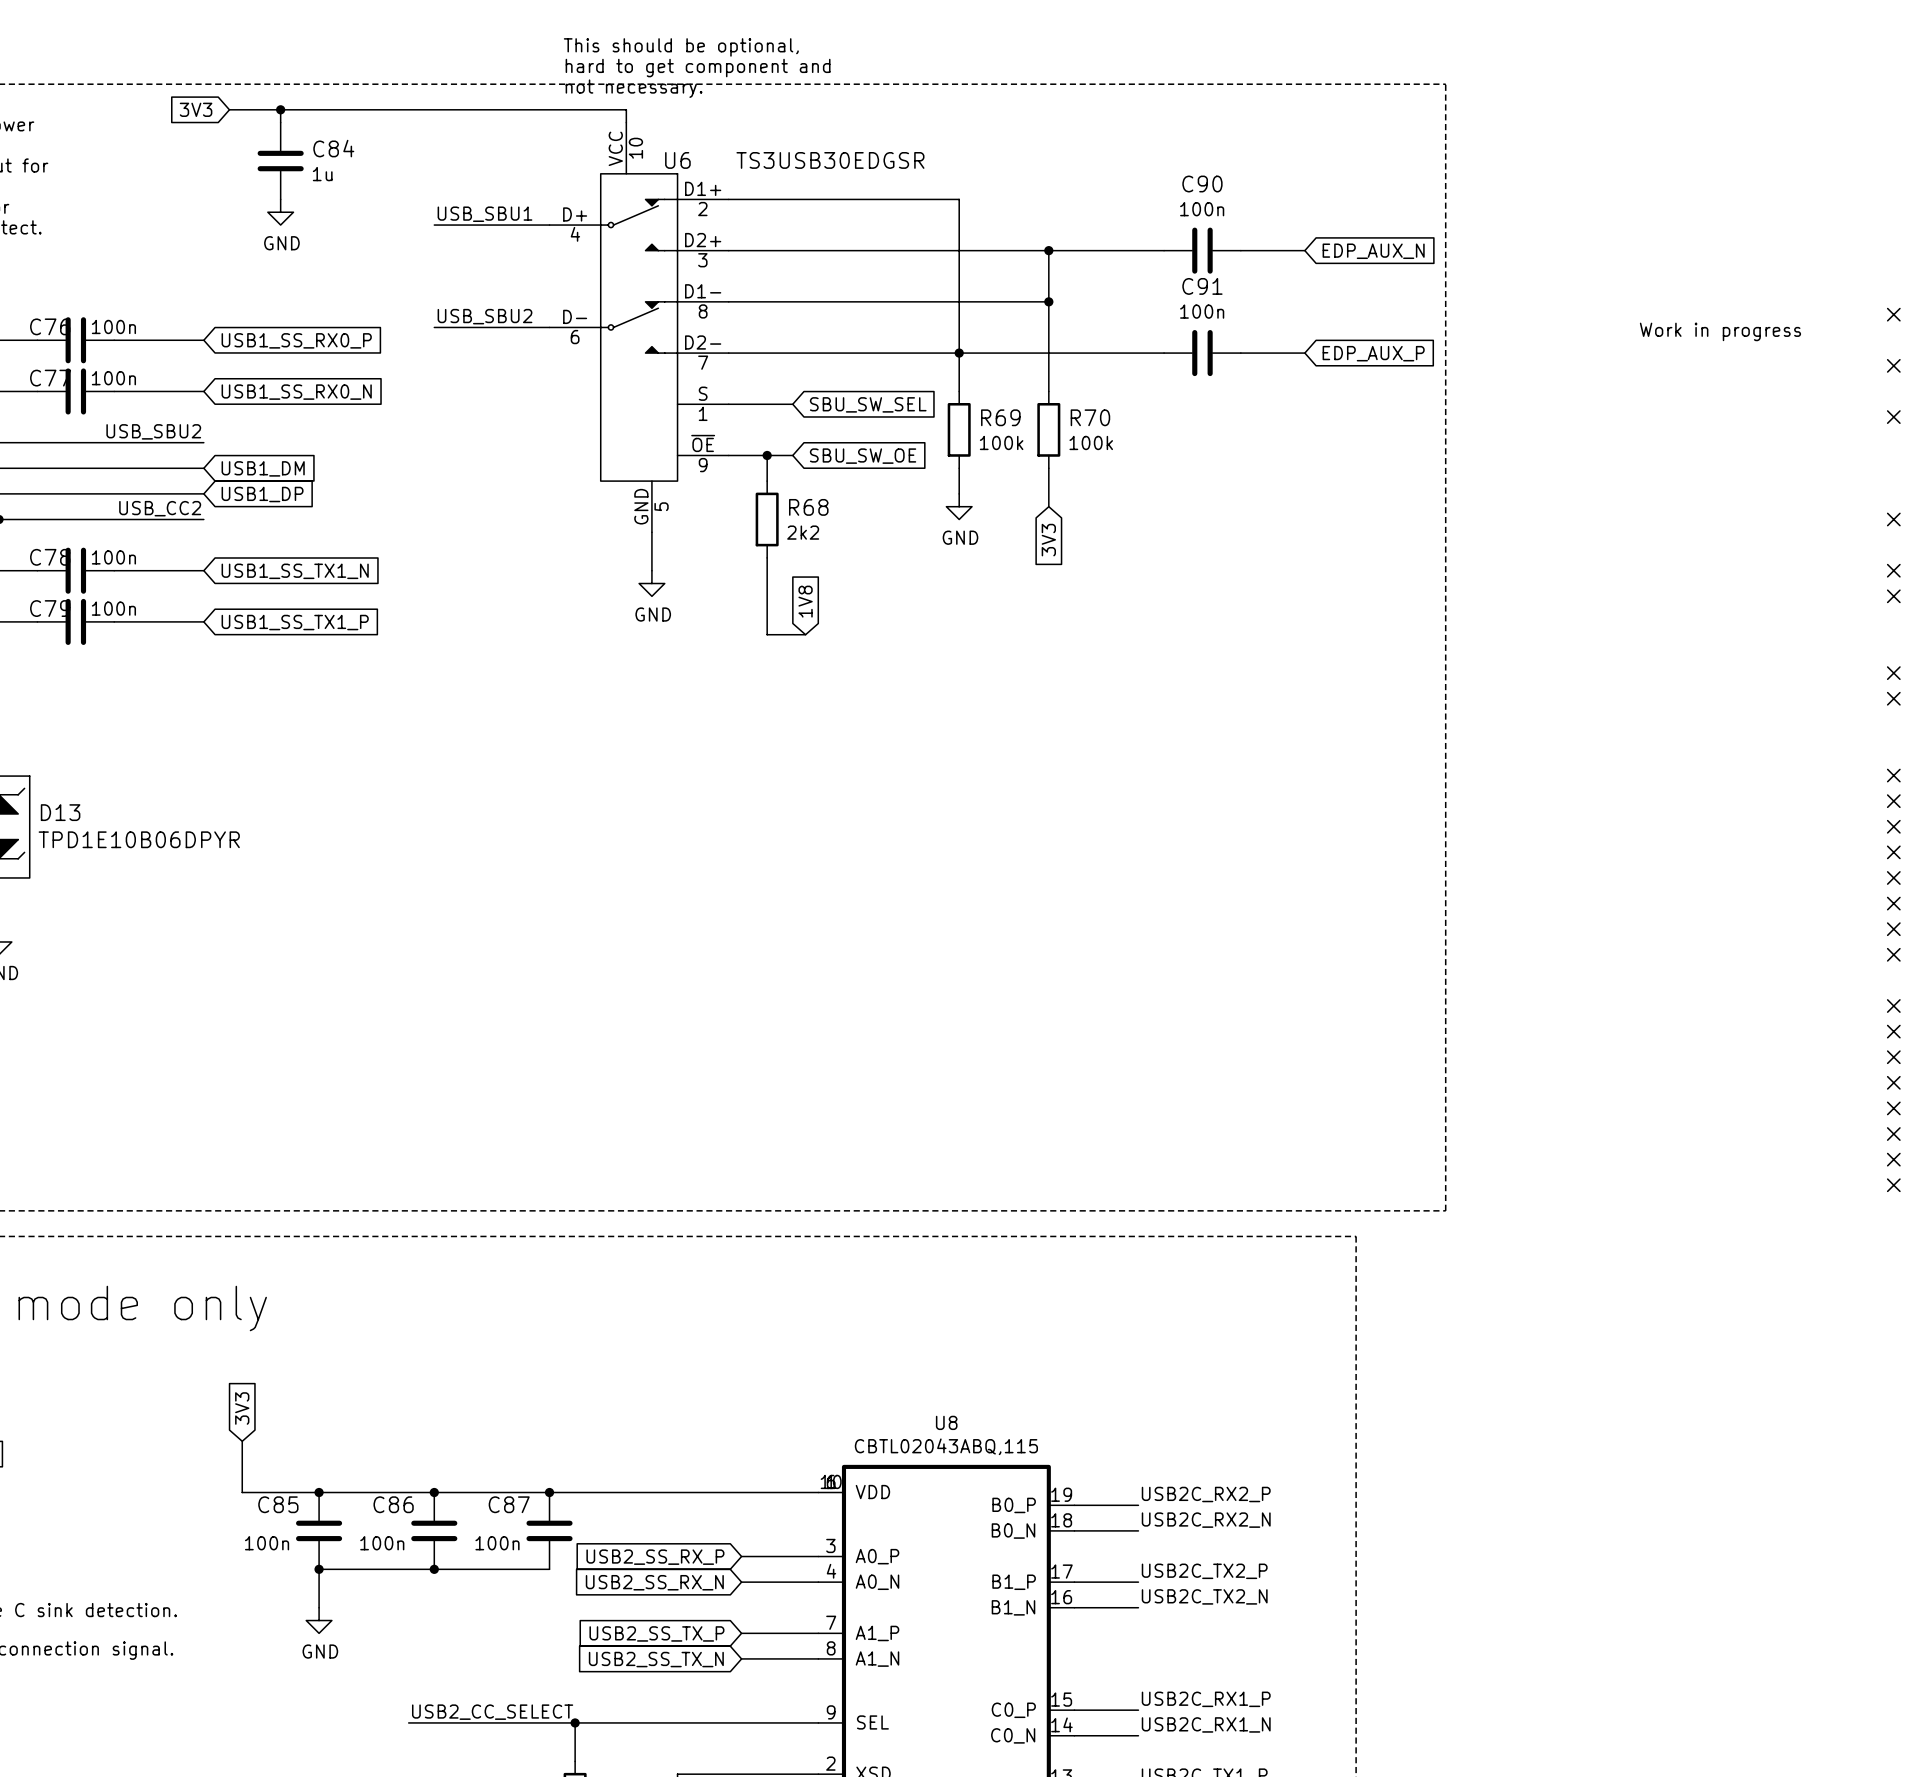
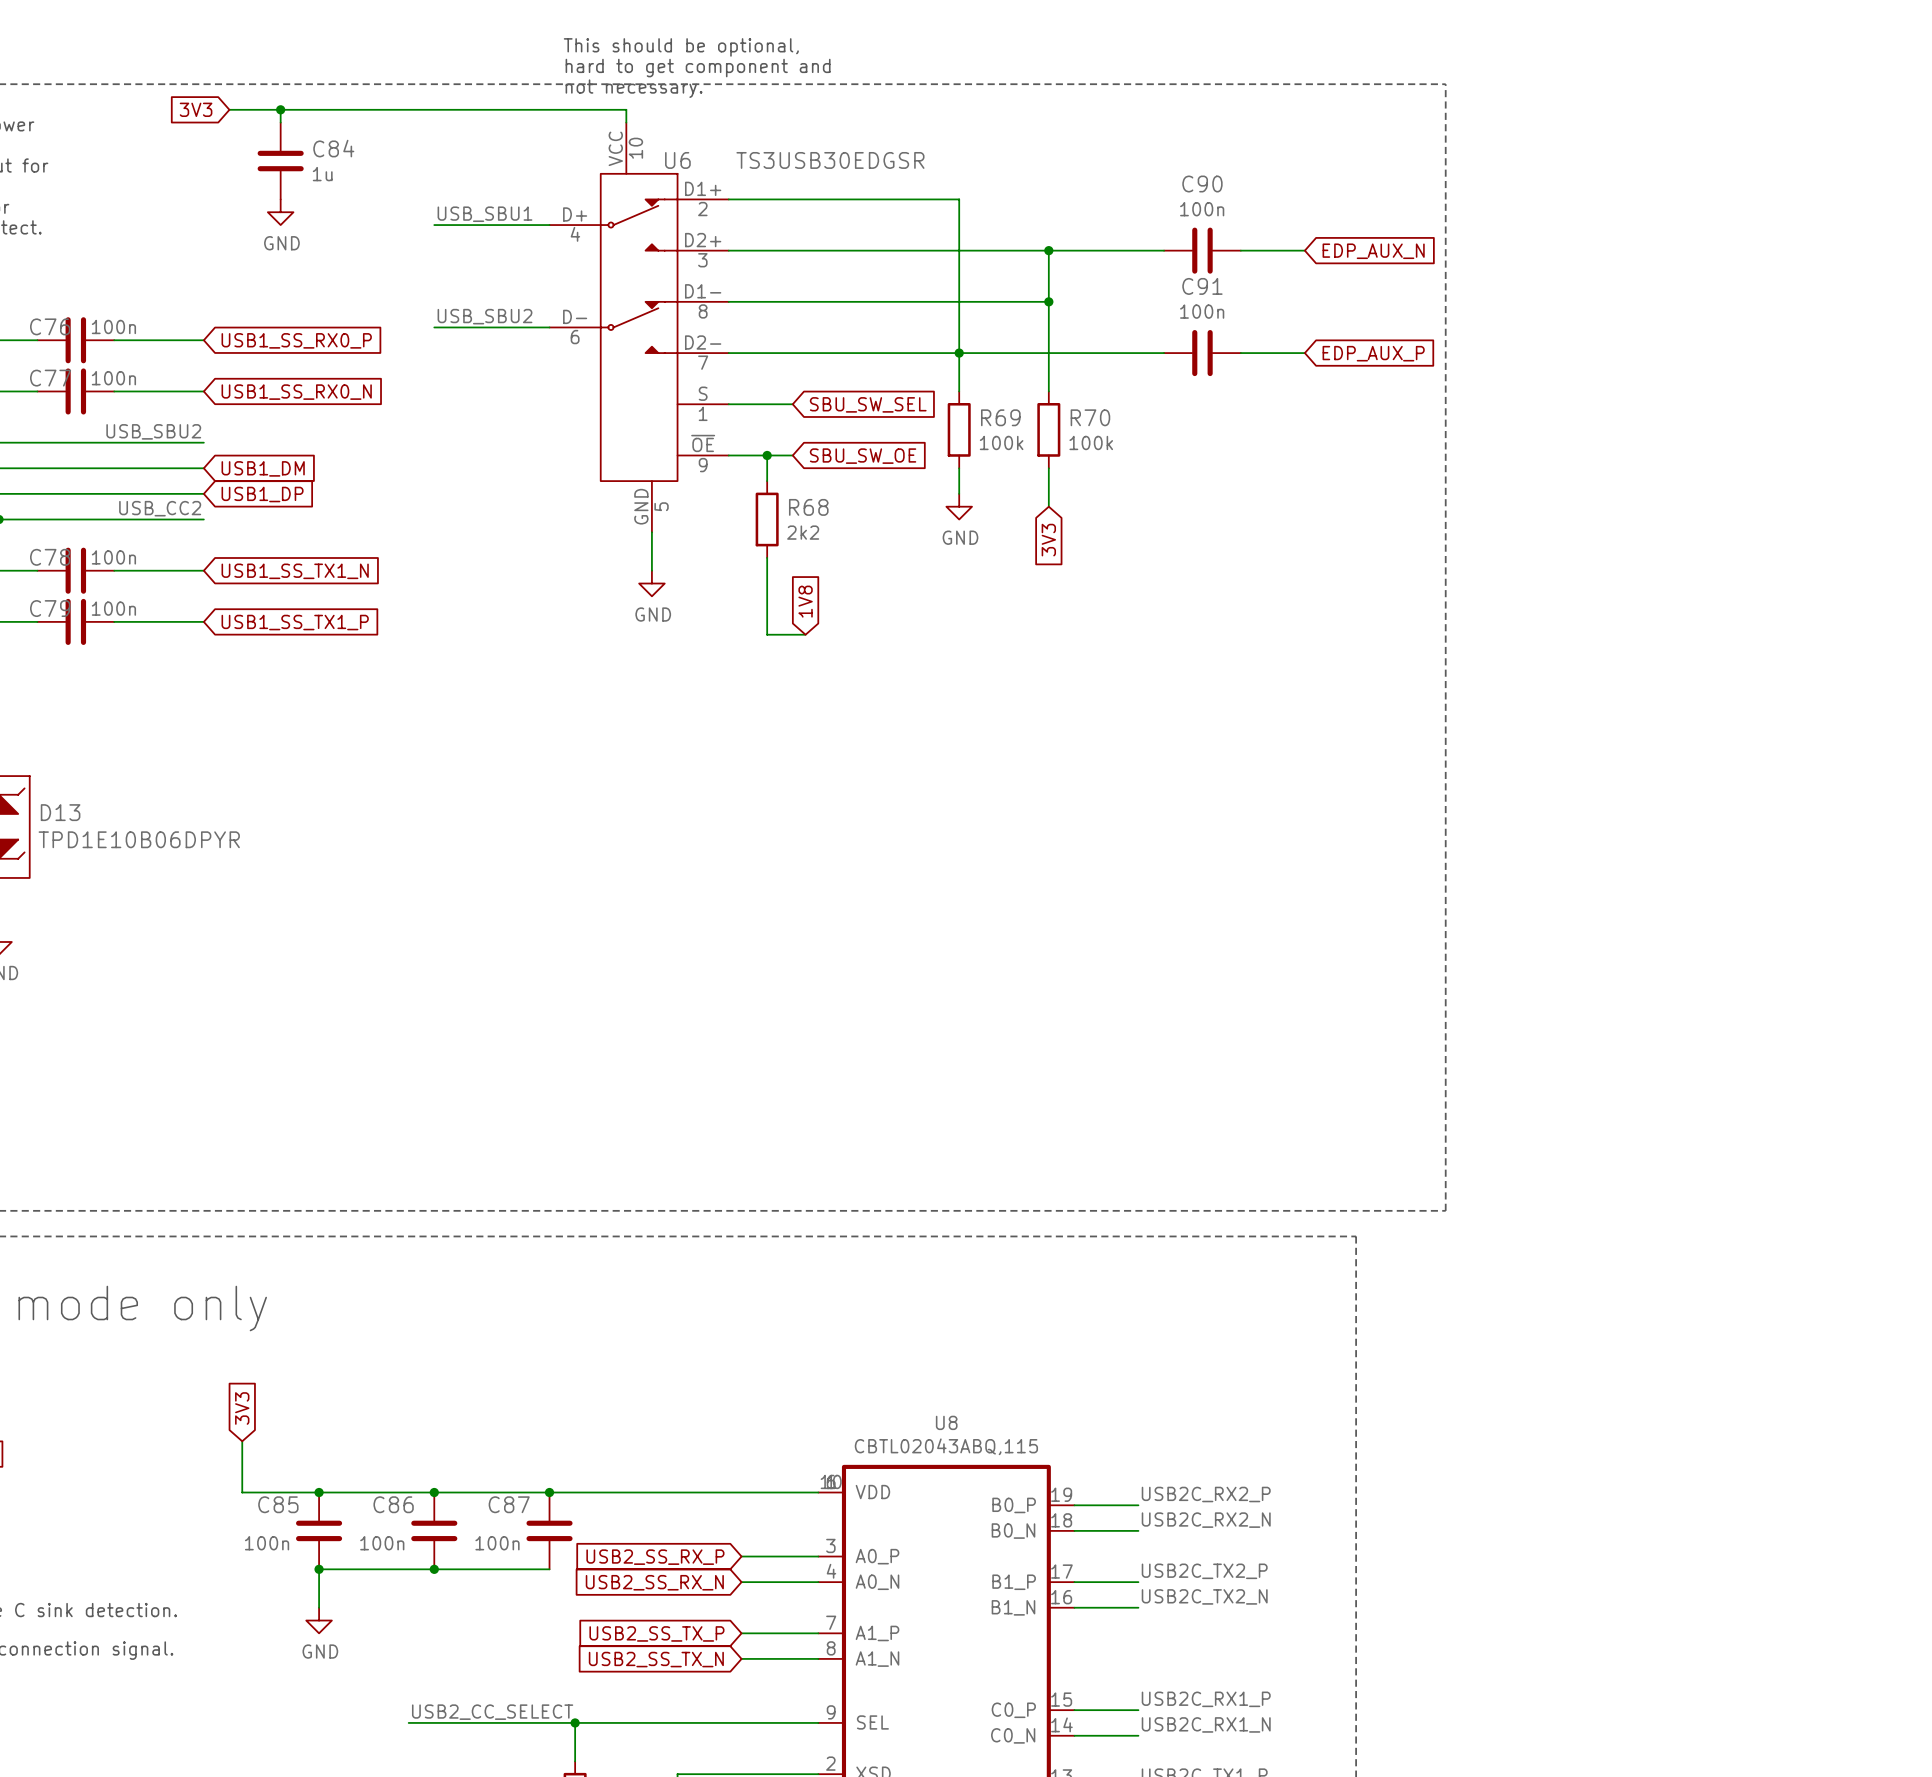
no-connect mark: (1893, 314) -> none
text: Work in progress (1720, 331) -> none
no-connect mark: (1893, 365) -> none
no-connect mark: (1893, 417) -> none
no-connect mark: (1893, 519) -> none
no-connect mark: (1893, 570) -> none
no-connect mark: (1893, 596) -> none
no-connect mark: (1893, 673) -> none
no-connect mark: (1893, 698) -> none
no-connect mark: (1893, 775) -> none
no-connect mark: (1893, 801) -> none
no-connect mark: (1893, 826) -> none
no-connect mark: (1893, 852) -> none
no-connect mark: (1893, 877) -> none
no-connect mark: (1893, 903) -> none
no-connect mark: (1893, 929) -> none
no-connect mark: (1893, 954) -> none
no-connect mark: (1893, 1006) -> none
no-connect mark: (1893, 1031) -> none
no-connect mark: (1893, 1057) -> none
no-connect mark: (1893, 1082) -> none
no-connect mark: (1893, 1108) -> none
no-connect mark: (1893, 1134) -> none
no-connect mark: (1893, 1159) -> none
no-connect mark: (1893, 1185) -> none

